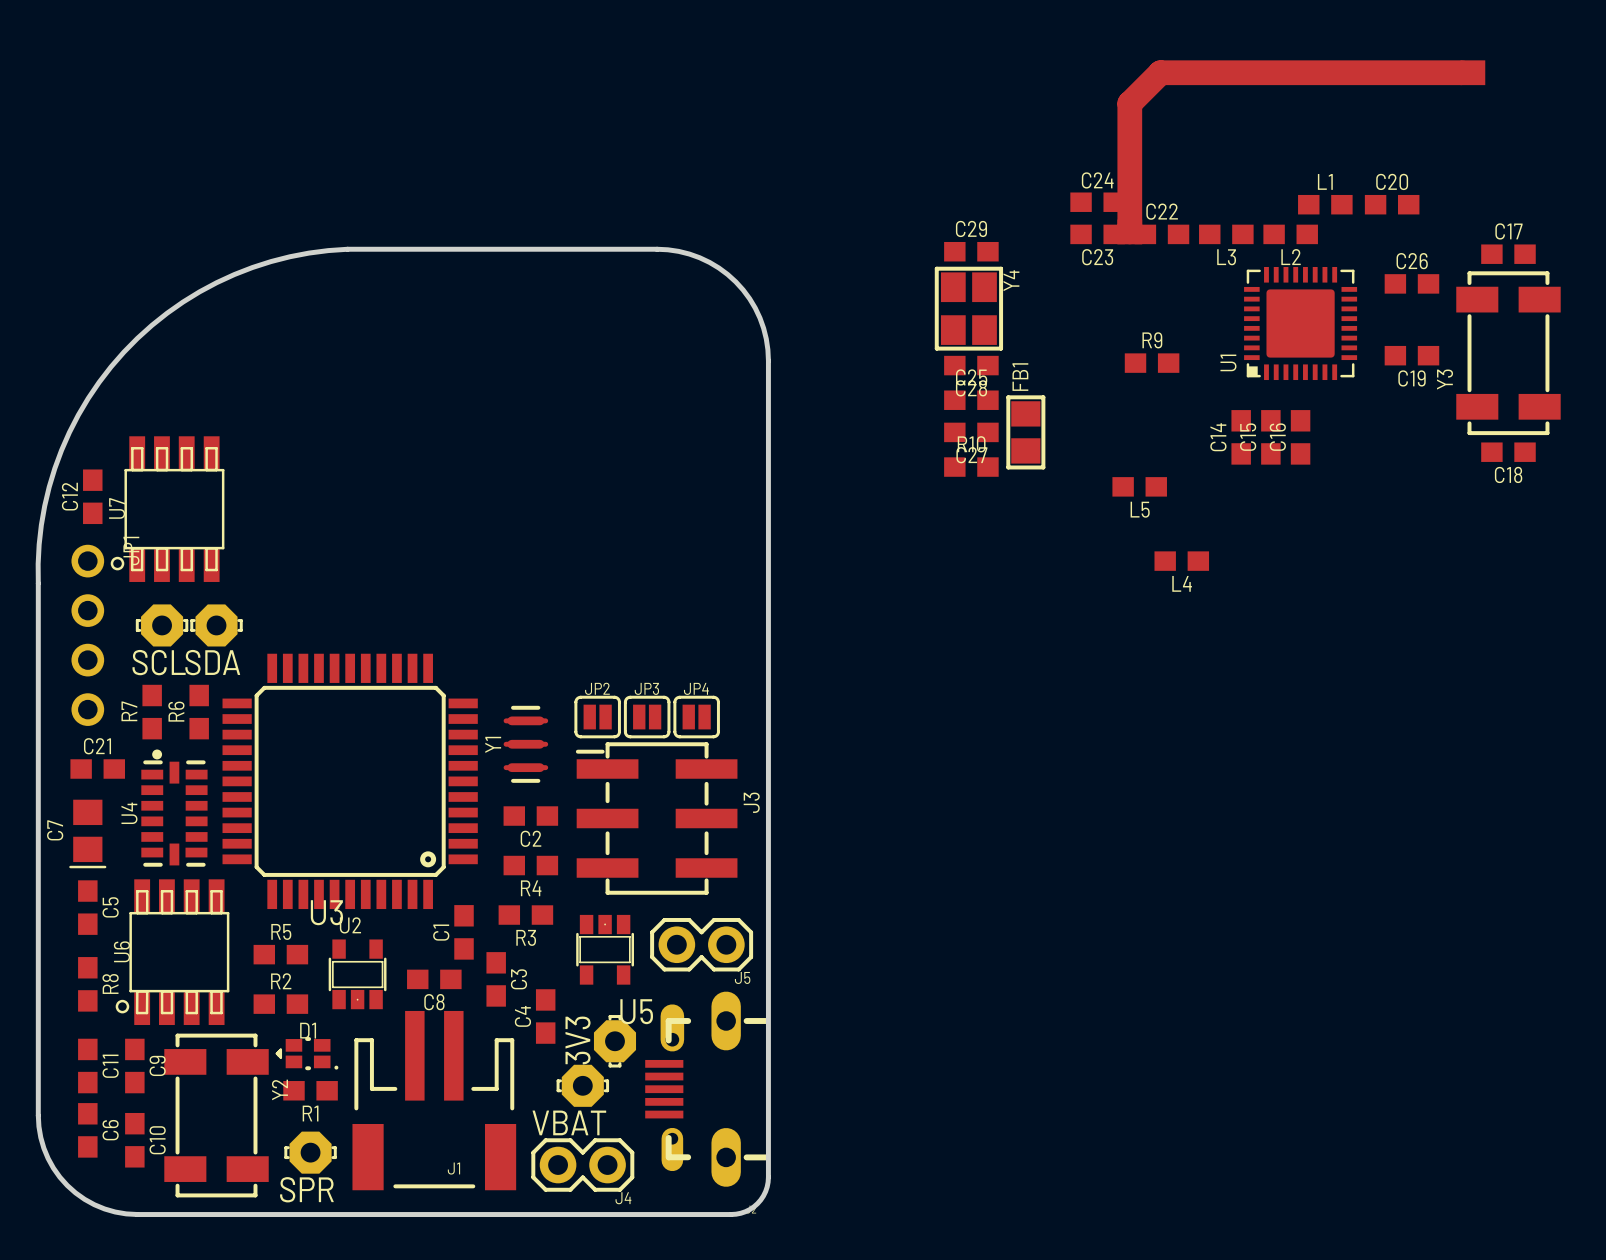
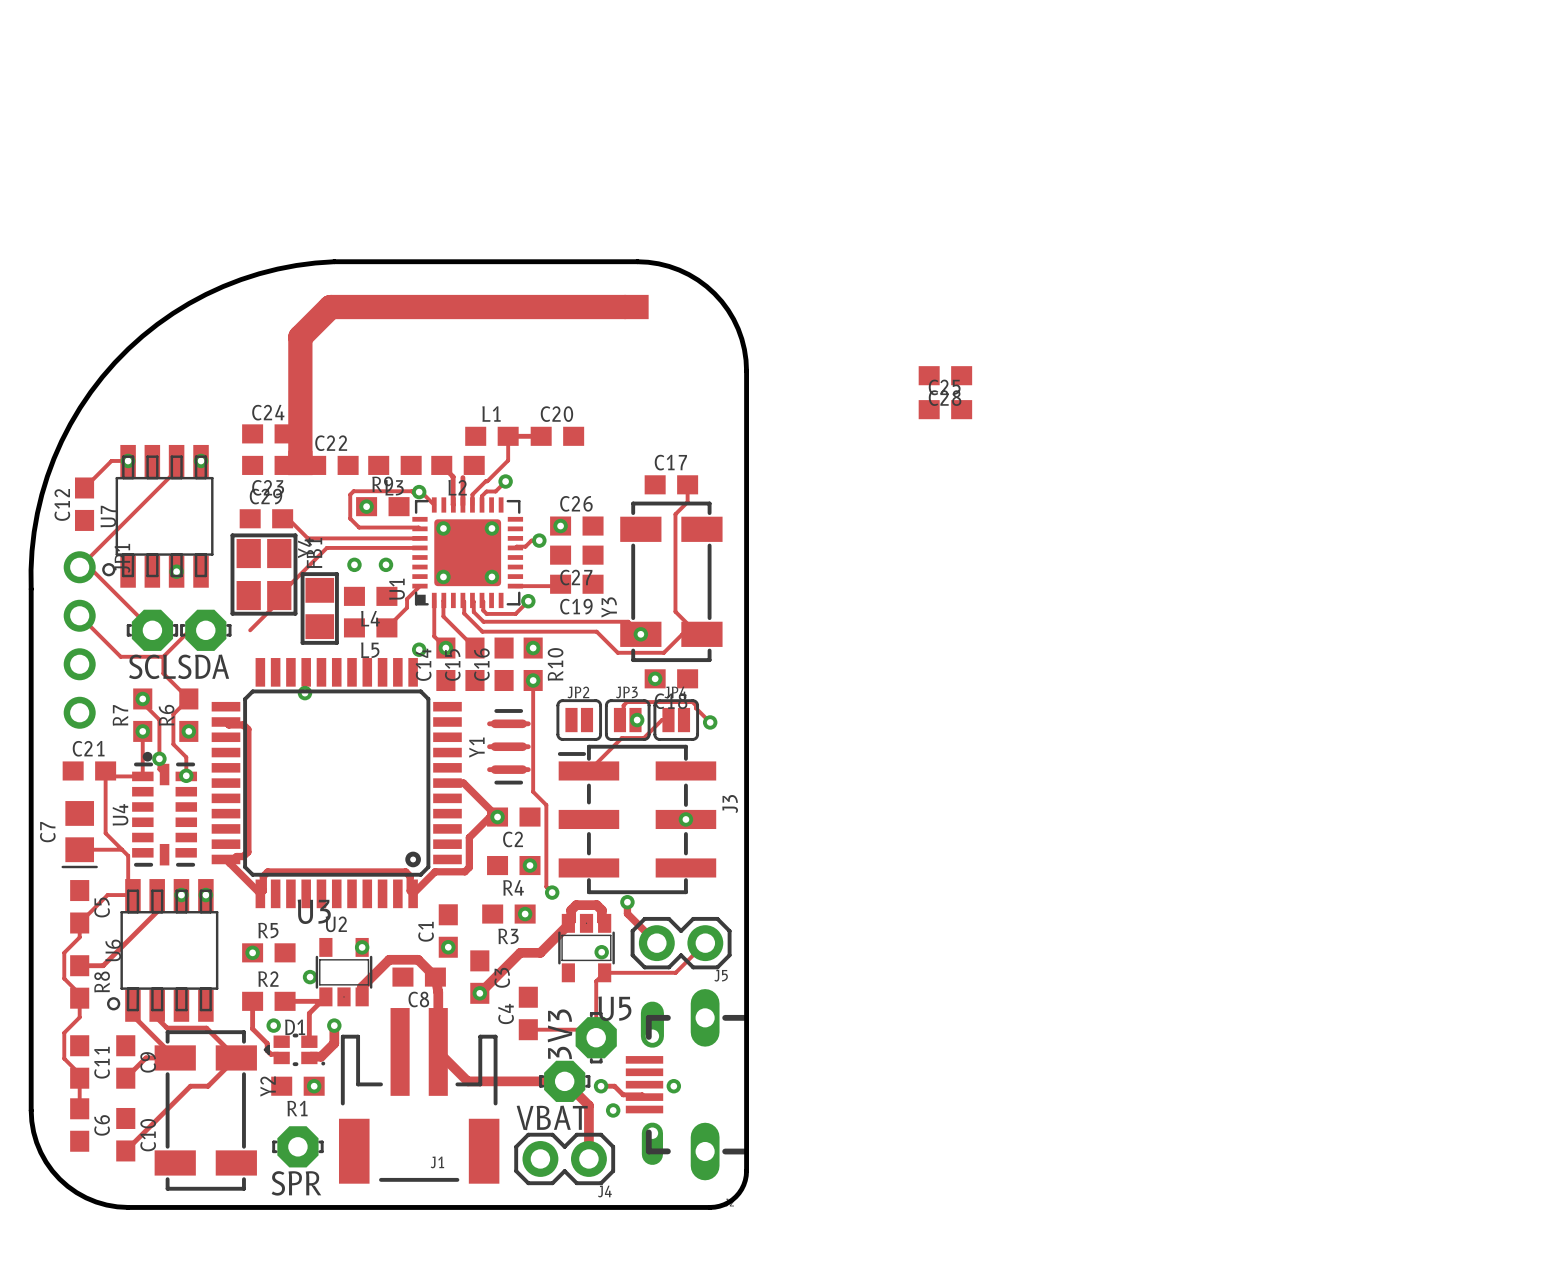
part: (1301, 152) -> none
C24 position: (1097, 202) -> (268, 433)
L1 position: (1325, 204) -> (491, 436)
C20 position: (1392, 204) -> (557, 436)
C23 position: (1097, 234) -> (268, 465)
C22 position: (1161, 234) -> (331, 465)
L3 position: (1226, 234) -> (394, 465)
L2 position: (1290, 234) -> (457, 465)
C29 position: (971, 251) -> (266, 518)
C17 position: (1508, 254) -> (671, 484)
C26 position: (1411, 283) -> (576, 526)
Y4 position: (968, 308) -> (263, 574)
U1 position: (1300, 323) -> (467, 552)
Y3 position: (1508, 353) -> (671, 581)
C19 position: (1411, 355) -> (576, 584)
R9 position: (1152, 363) -> (382, 506)
part: none -> (468, 385)
track: none -> (541, 436) (508, 436) (508, 460) (472, 494) (472, 504)
C27 position: (971, 432) -> (576, 555)
FB1 position: (1025, 432) -> (319, 608)
C14 position: (1241, 437) -> (445, 664)
C15 position: (1270, 437) -> (474, 664)
C16 position: (1300, 437) -> (504, 664)
track: none -> (128, 460) (111, 460) (84, 487)
via: none -> (128, 460)
track: none -> (176, 460) (176, 470) (79, 567) (89, 567) (152, 630)
via: none -> (201, 460)
C18 position: (1508, 452) -> (671, 678)
track: none -> (441, 465) (453, 476) (453, 504)
R10 rotation: 0° (971, 467) -> 90° clockwise (533, 664)
R10 position: (971, 467) -> (533, 664)
track: none -> (462, 477) (462, 504)
track: none -> (505, 481) (495, 491) (486, 491) (482, 496) (482, 504)
via: none -> (505, 481)
track: none -> (687, 484) (687, 502) (675, 514) (675, 611) (698, 634)
via: none -> (419, 492)
L5 position: (1139, 486) -> (370, 627)
track: none -> (434, 504) (421, 492) (353, 491) (350, 494) (350, 518) (359, 527) (419, 528)
via: none -> (366, 506)
track: none -> (287, 517) (282, 518) (288, 518) (307, 538) (419, 538)
via: none -> (560, 526)
via: none -> (443, 528)
via: none -> (491, 528)
track: none -> (539, 540) (531, 540) (525, 546) (515, 547)
via: none -> (539, 540)
track: none -> (419, 547) (326, 547) (279, 595) (279, 601) (250, 630)
via: none -> (354, 564)
via: none -> (385, 564)
L4 position: (1181, 561) -> (370, 596)
via: none -> (176, 571)
via: none -> (443, 576)
via: none -> (491, 576)
track: none -> (560, 584) (558, 586) (515, 586)
track: none -> (419, 586) (407, 599) (407, 607) (386, 627)
track: none -> (434, 600) (434, 636) (445, 648)
track: none -> (443, 600) (443, 616) (474, 648)
track: none -> (462, 600) (464, 613) (482, 631) (596, 631) (617, 652) (663, 652) (682, 634) (701, 634)
track: none -> (472, 600) (473, 611) (483, 621) (628, 621) (640, 634)
track: none -> (482, 600) (483, 610) (486, 613) (515, 613) (528, 601)
via: none -> (528, 601)
track: none -> (79, 615) (120, 656) (163, 656)
track: none -> (205, 630) (189, 630) (163, 656)
via: none -> (640, 634)
via: none -> (445, 648)
via: none -> (533, 648)
via: none -> (419, 649)
track: none -> (163, 656) (163, 673) (188, 698) (173, 714) (173, 744) (186, 757) (186, 775)
via: none -> (655, 678)
track: none -> (533, 680) (533, 791) (546, 805) (546, 886) (552, 892)
via: none -> (533, 680)
via: none -> (304, 693)
track: none -> (142, 698) (142, 703) (159, 719) (159, 769) (164, 774)
via: none -> (142, 698)
track: none -> (619, 720) (623, 716) (623, 705) (627, 702) (692, 702) (710, 722)
via: none -> (637, 720)
track: none -> (668, 720) (661, 720) (643, 738) (621, 738) (588, 770)
track: none -> (225, 721) (228, 724) (243, 724) (247, 729) (247, 852) (243, 856) (236, 856) (229, 863)
via: none -> (710, 722)
track: none -> (142, 731) (142, 776)
via: none -> (142, 731)
via: none -> (188, 731)
via: none -> (159, 758)
via: none -> (186, 775)
track: none -> (142, 776) (111, 776) (105, 770) (105, 833) (128, 855) (128, 890) (132, 895) (107, 895) (79, 922) (79, 937) (64, 952) (64, 978) (79, 994) (79, 1017) (64, 1032) (64, 1058) (79, 1074) (79, 1108)
track: none -> (447, 783) (463, 783) (497, 817) (489, 817) (469, 837) (469, 867) (464, 871) (435, 871) (413, 893) (410, 890) (410, 876) (405, 871) (267, 871) (263, 876) (263, 890) (260, 893)
via: none -> (497, 817)
via: none -> (685, 819)
track: none -> (79, 849) (122, 849)
track: none -> (225, 859) (258, 892) (261, 892)
via: none -> (529, 865)
via: none -> (552, 892)
track: none -> (157, 895) (157, 911) (103, 965) (79, 965)
via: none -> (181, 895)
via: none -> (205, 895)
track: none -> (627, 902) (627, 913) (656, 943)
via: none -> (627, 902)
via: none -> (525, 914)
track: none -> (604, 923) (601, 920) (601, 910) (596, 905) (576, 905) (571, 910) (571, 920) (568, 924) (540, 952) (520, 952) (479, 993)
track: none -> (705, 943) (675, 972) (604, 972) (596, 981) (596, 1037) (588, 1029) (528, 1029)
via: none -> (448, 947)
via: none -> (362, 947)
via: none -> (252, 952)
via: none -> (601, 952)
via: none -> (310, 977)
via: none -> (479, 993)
track: none -> (325, 996) (309, 1013) (309, 1041)
track: none -> (362, 996) (362, 986) (389, 959) (418, 959) (435, 977) (438, 992) (438, 1051) (467, 1081) (564, 1081) (588, 1105) (588, 1158)
track: none -> (252, 1001) (252, 1028) (267, 1043) (267, 1050) (270, 1054) (277, 1054) (281, 1057)
track: none -> (285, 1001) (321, 1001)
track: none -> (132, 1005) (132, 1015) (175, 1057) (146, 1057) (125, 1078)
track: none -> (157, 1005) (157, 1018) (167, 1028) (206, 1028) (236, 1057) (208, 1086) (190, 1086) (125, 1150)
via: none -> (273, 1025)
track: none -> (334, 1025) (334, 1043) (321, 1056) (309, 1057)
via: none -> (334, 1025)
via: none -> (314, 1086)
track: none -> (601, 1086) (614, 1086) (623, 1094) (642, 1094) (644, 1097)
via: none -> (601, 1086)
via: none -> (673, 1086)
via: none -> (613, 1110)

